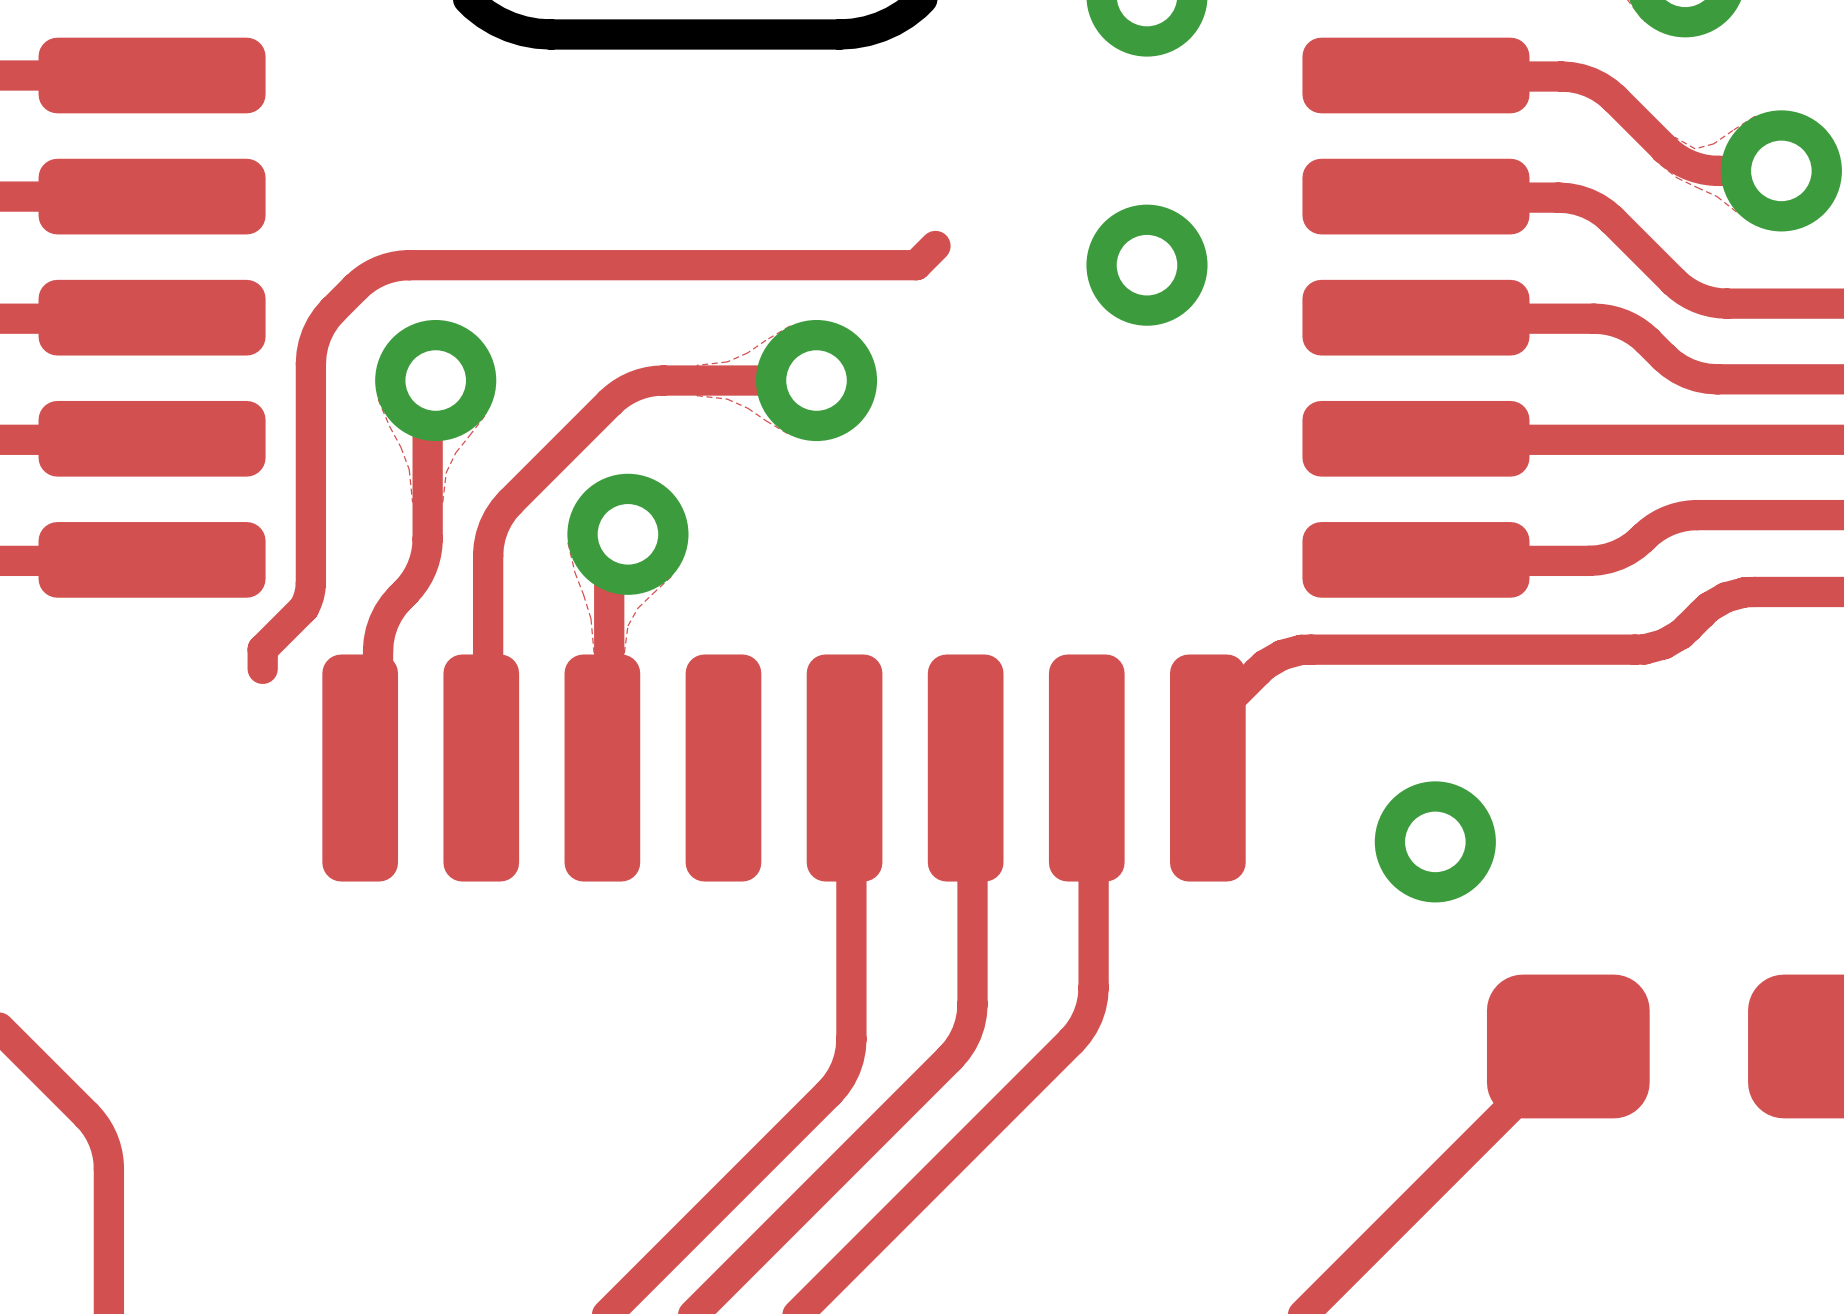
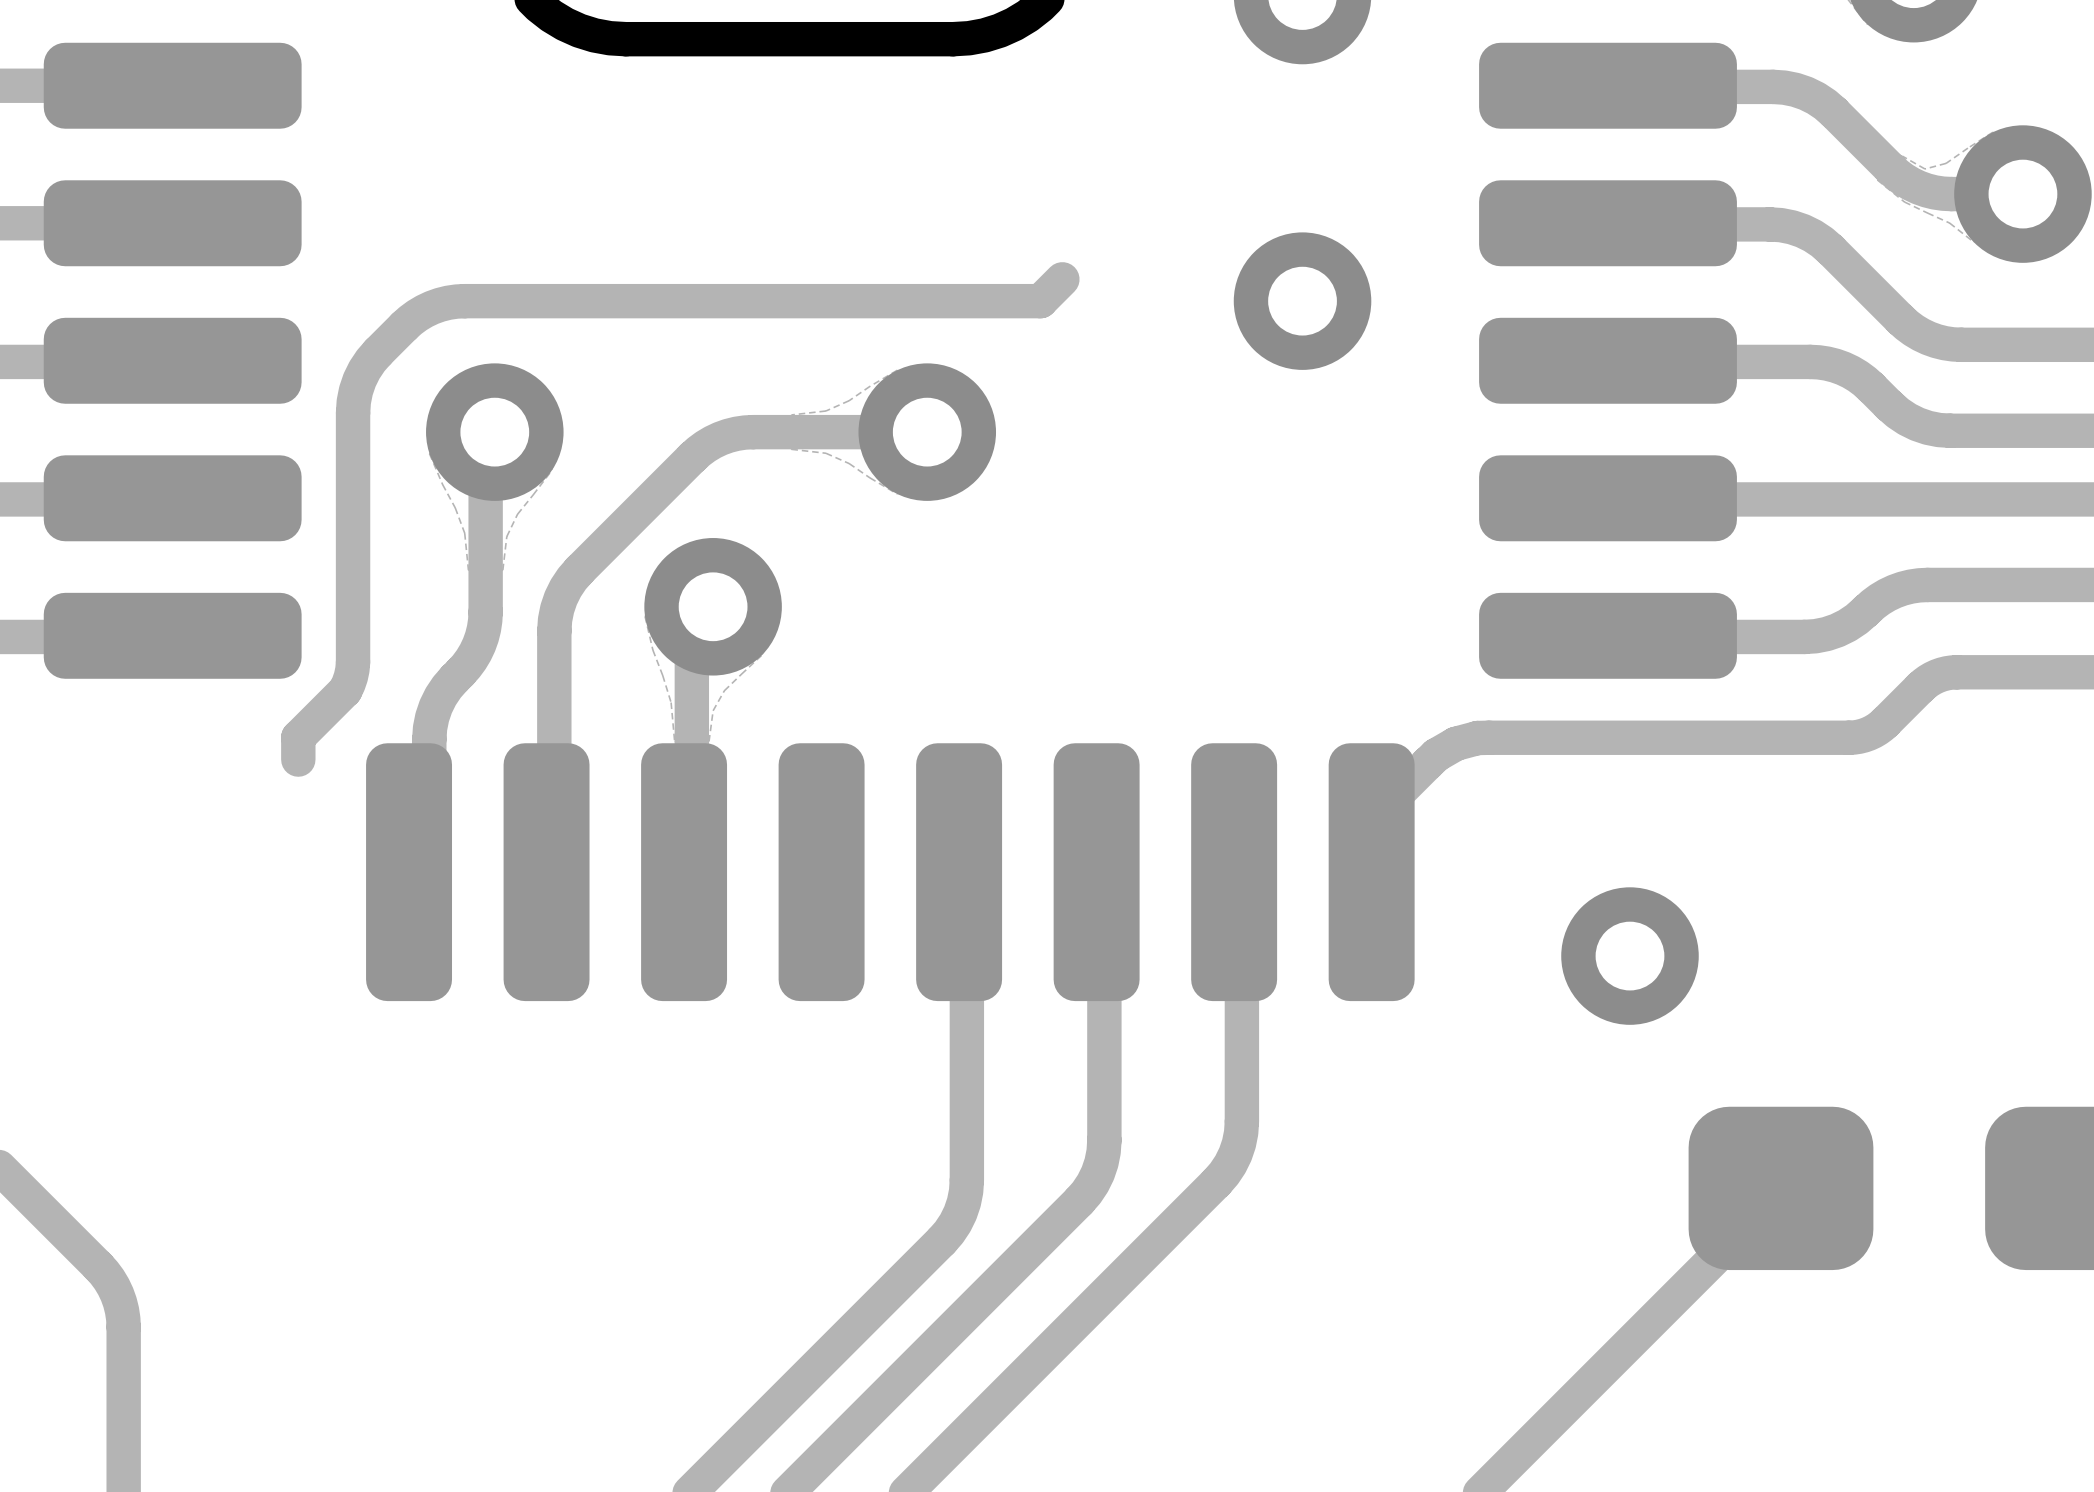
track: (1755, 591) (1745, 592) (1725, 597) (1708, 607) (1680, 634) (1663, 644) (1644, 649) (1627, 649) -> (1993, 672) (1951, 672) (1937, 676) (1924, 683) (1877, 729) (1863, 735) (1848, 737)

